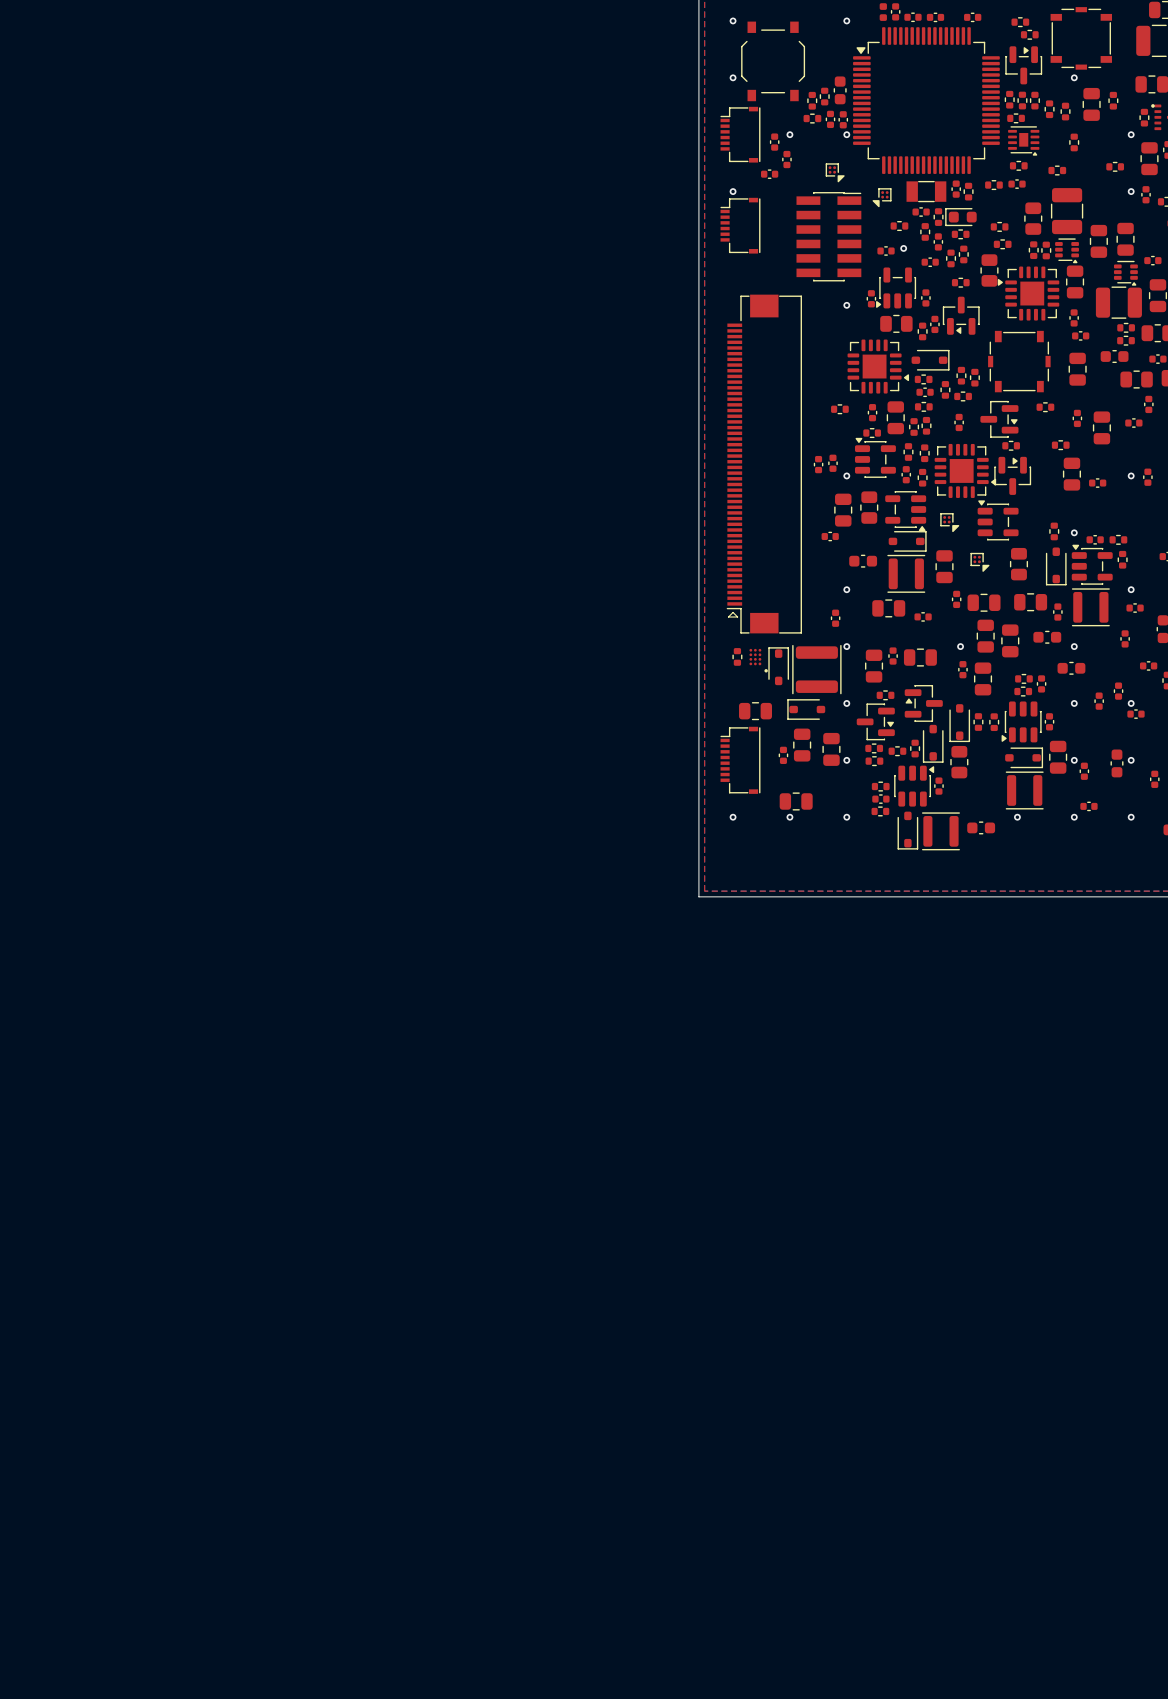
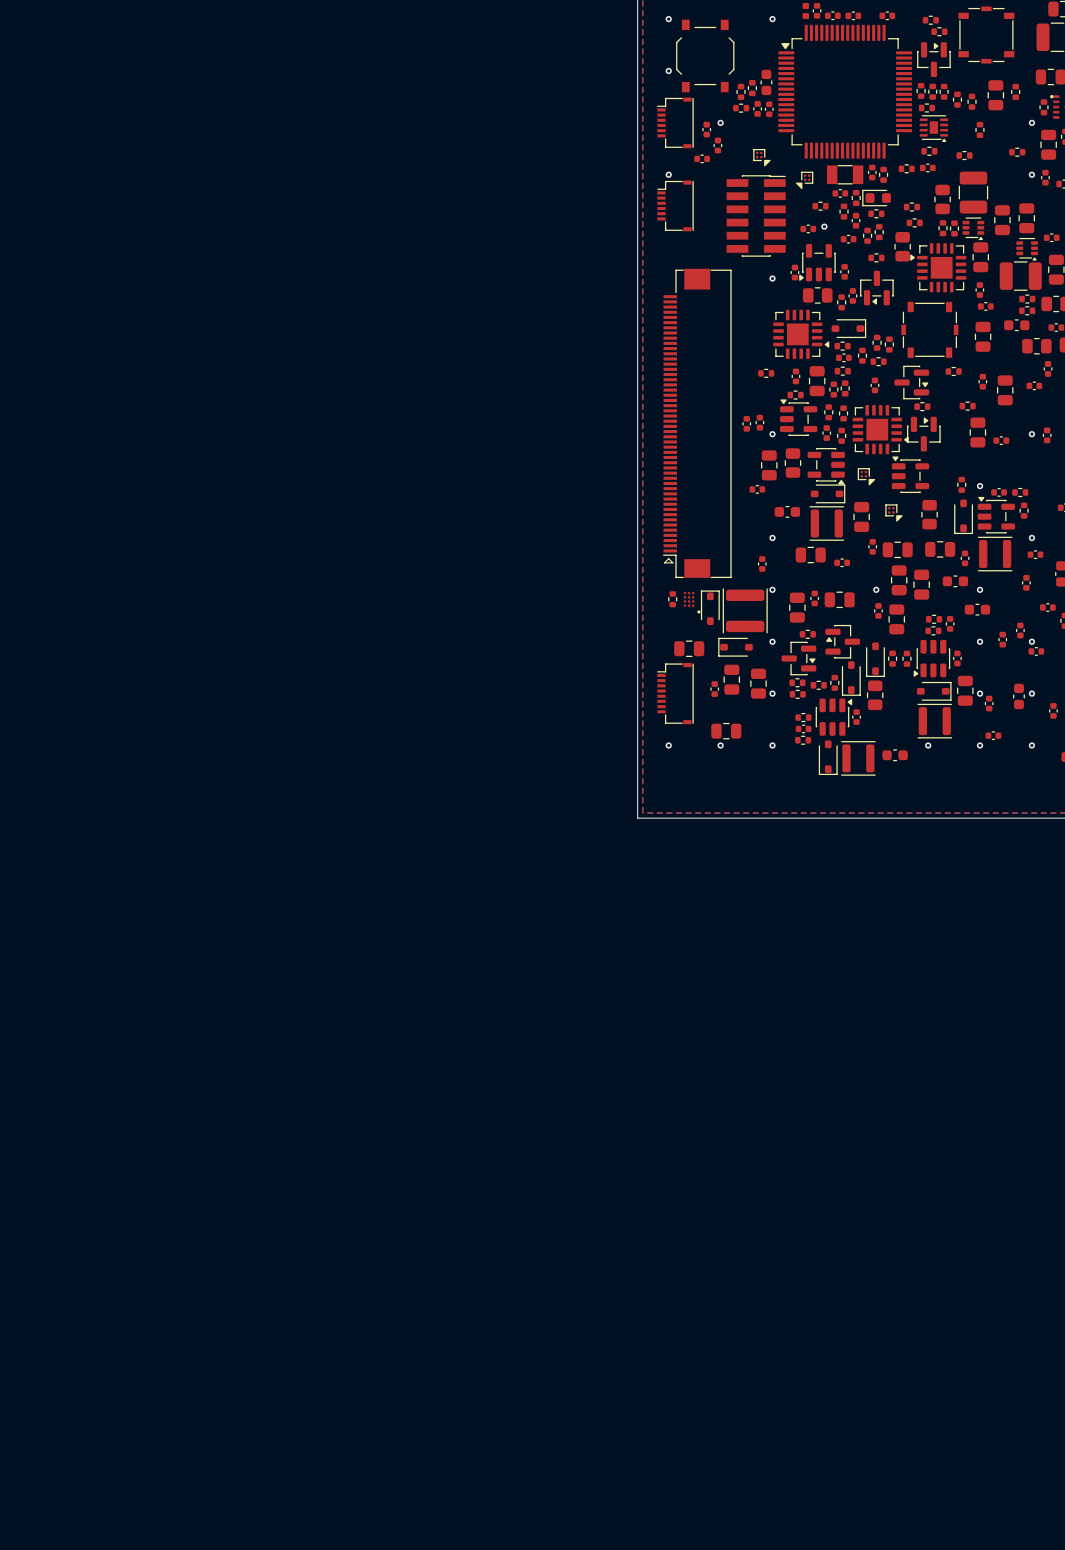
via: (1074, 77) -> none
via: (846, 134) -> none

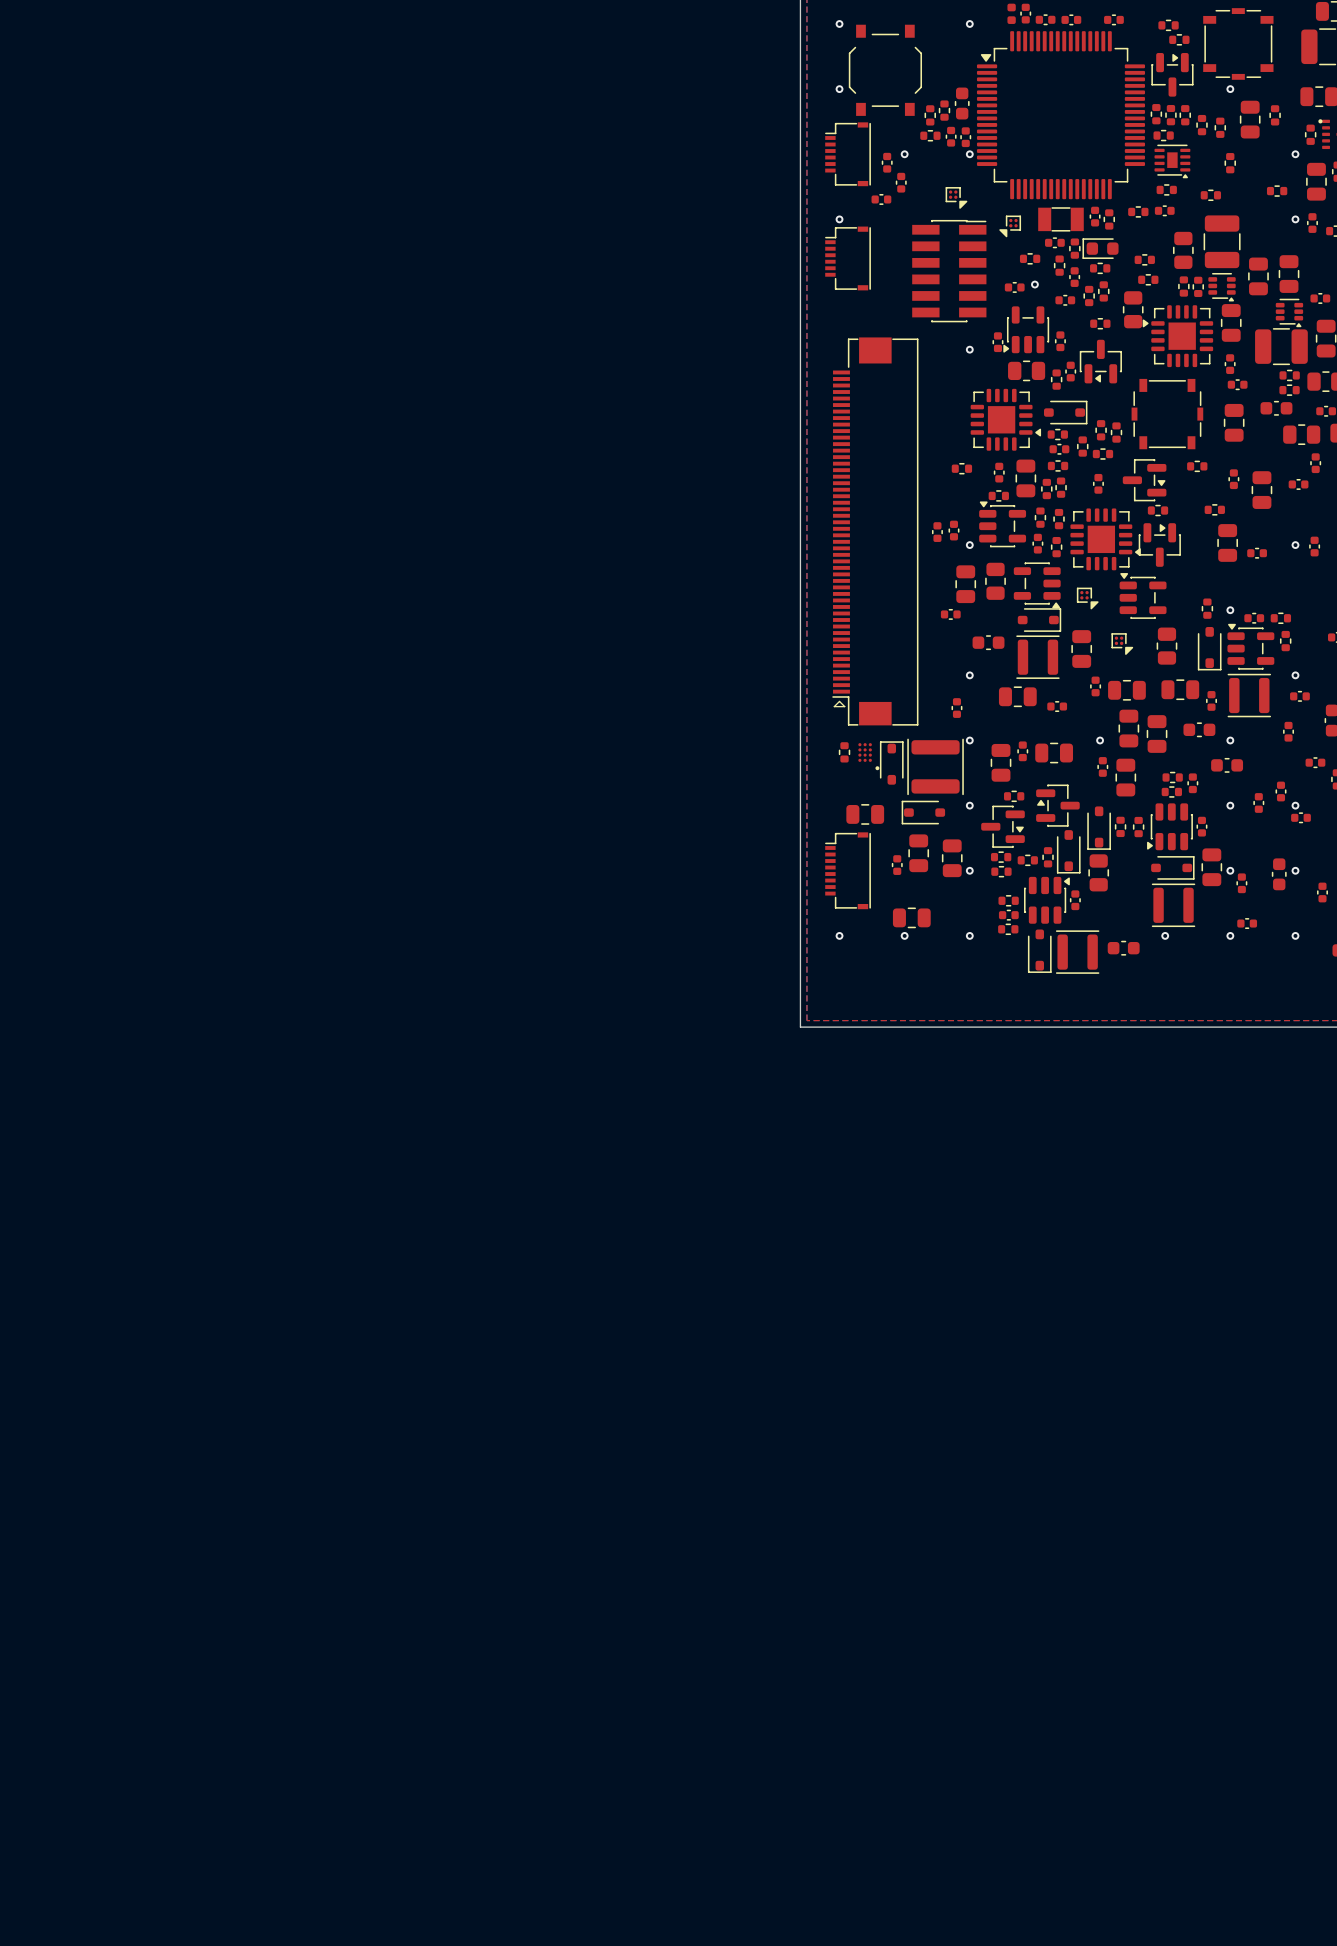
via: none -> (1230, 89)
via: none -> (969, 154)

